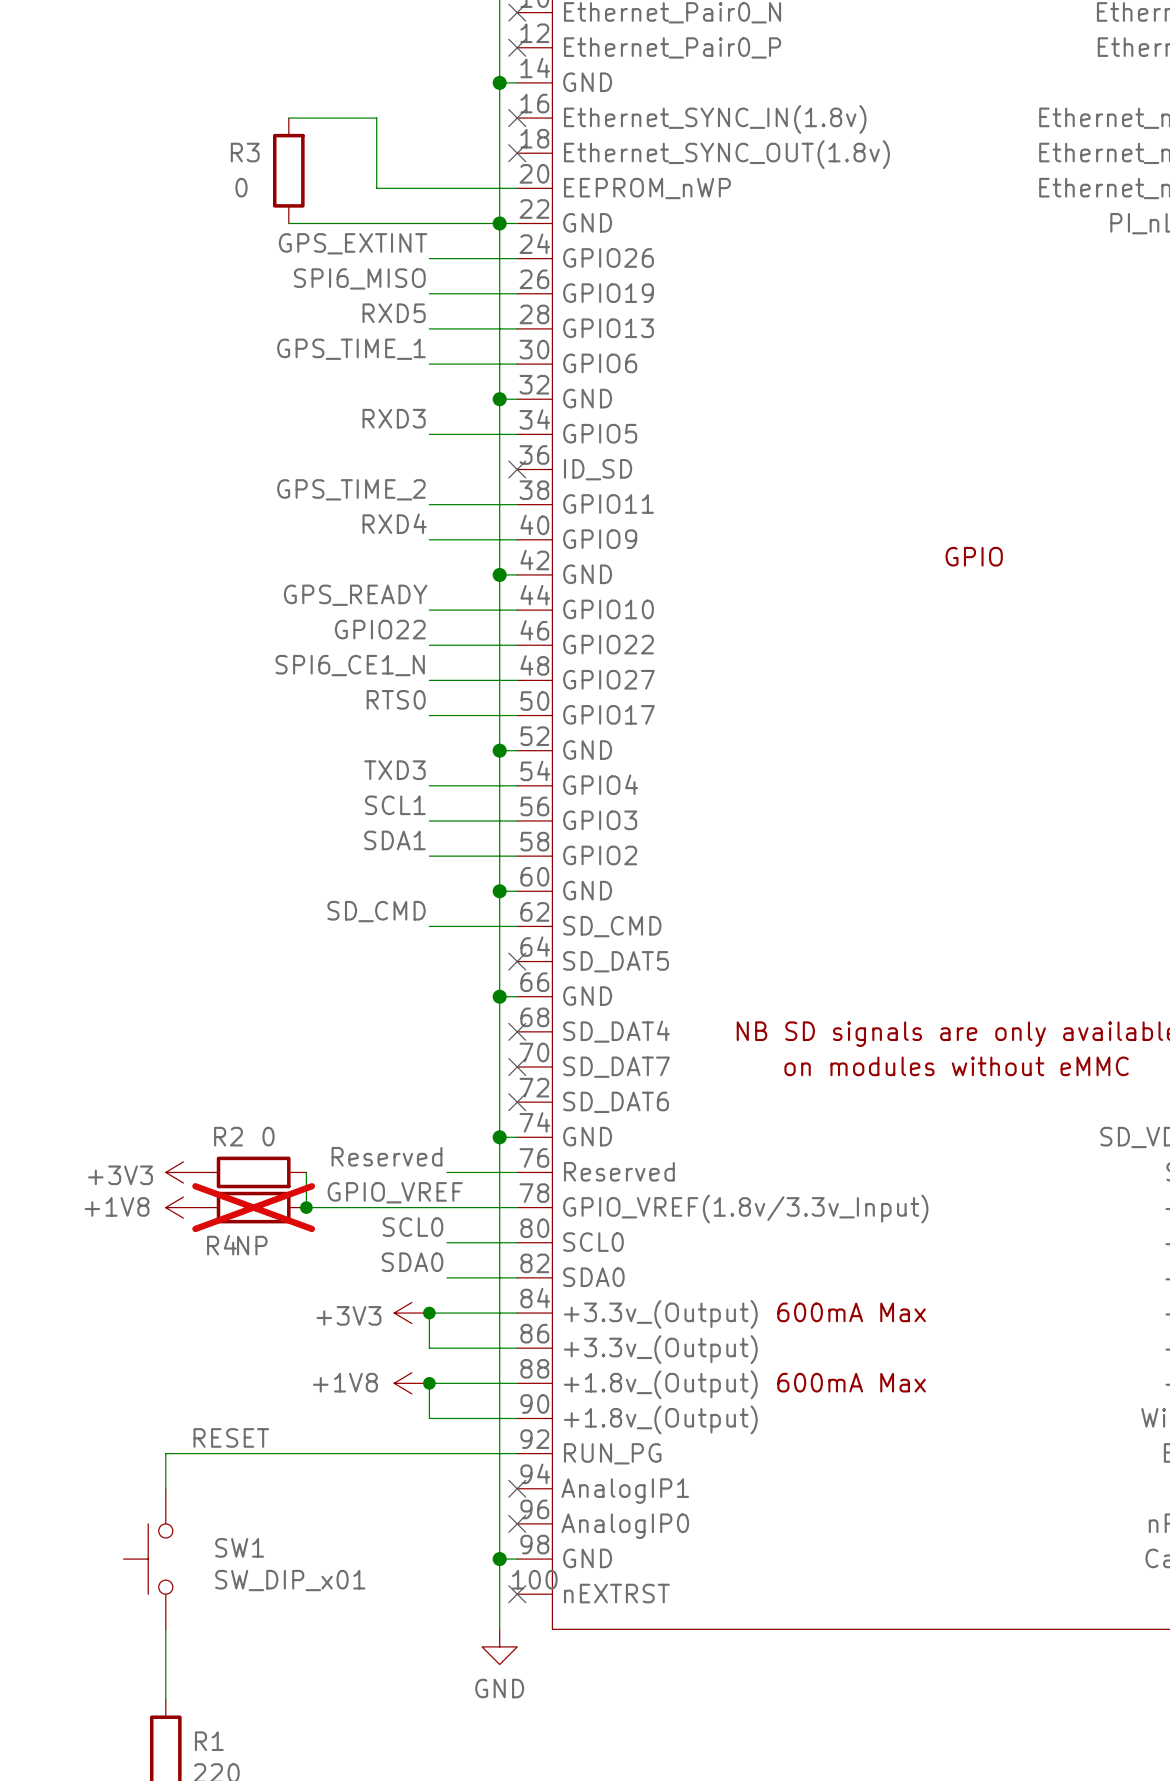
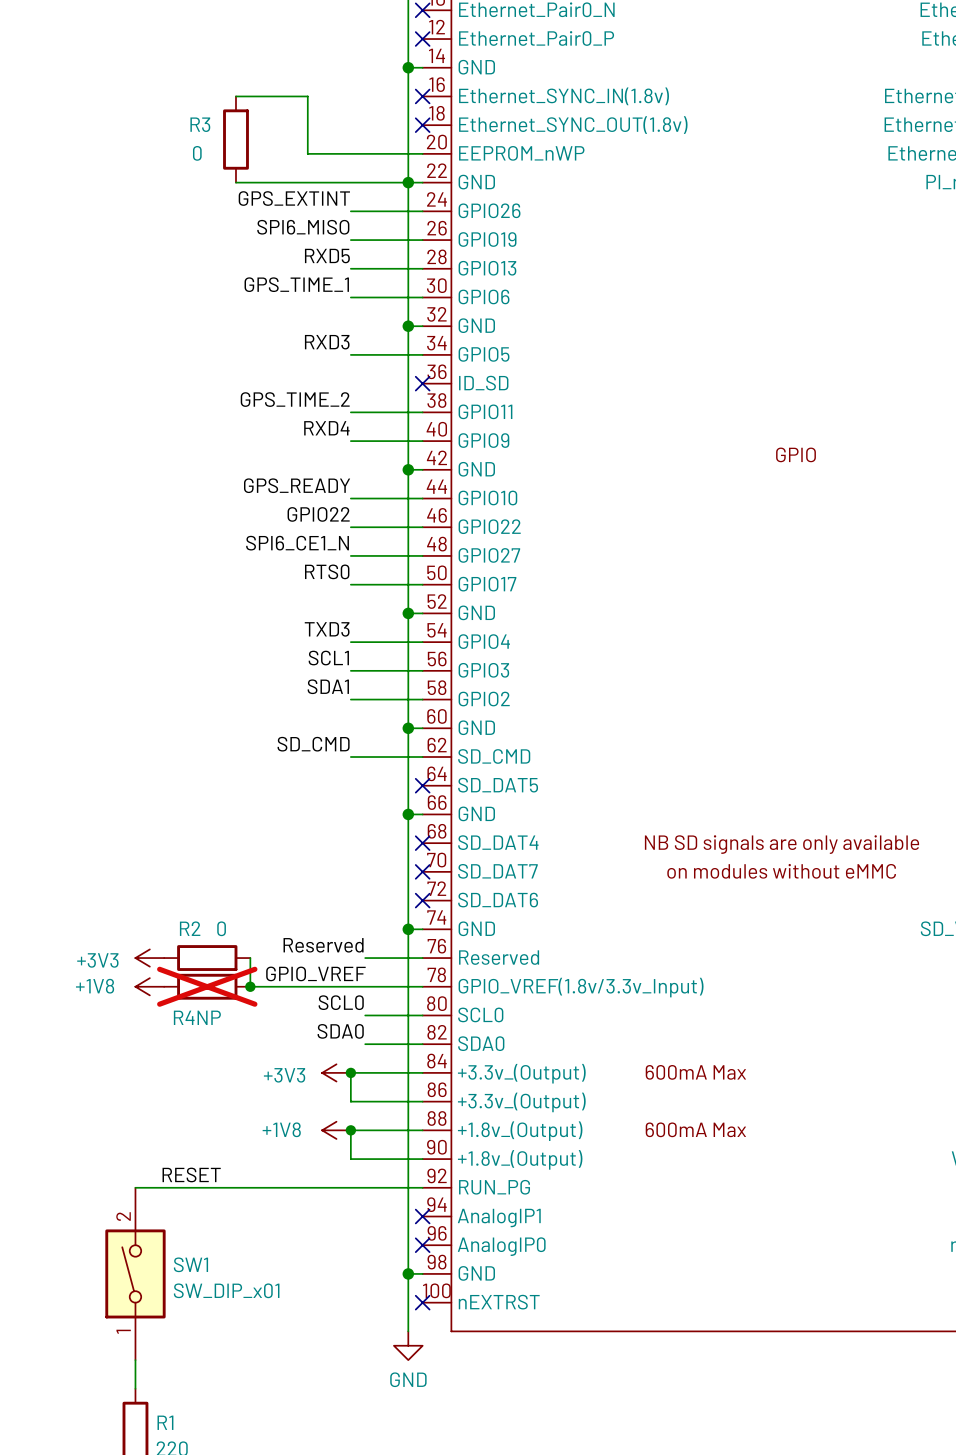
SW1 symbol: [123, 1488, 173, 1630] -> [105, 1187, 166, 1361]

